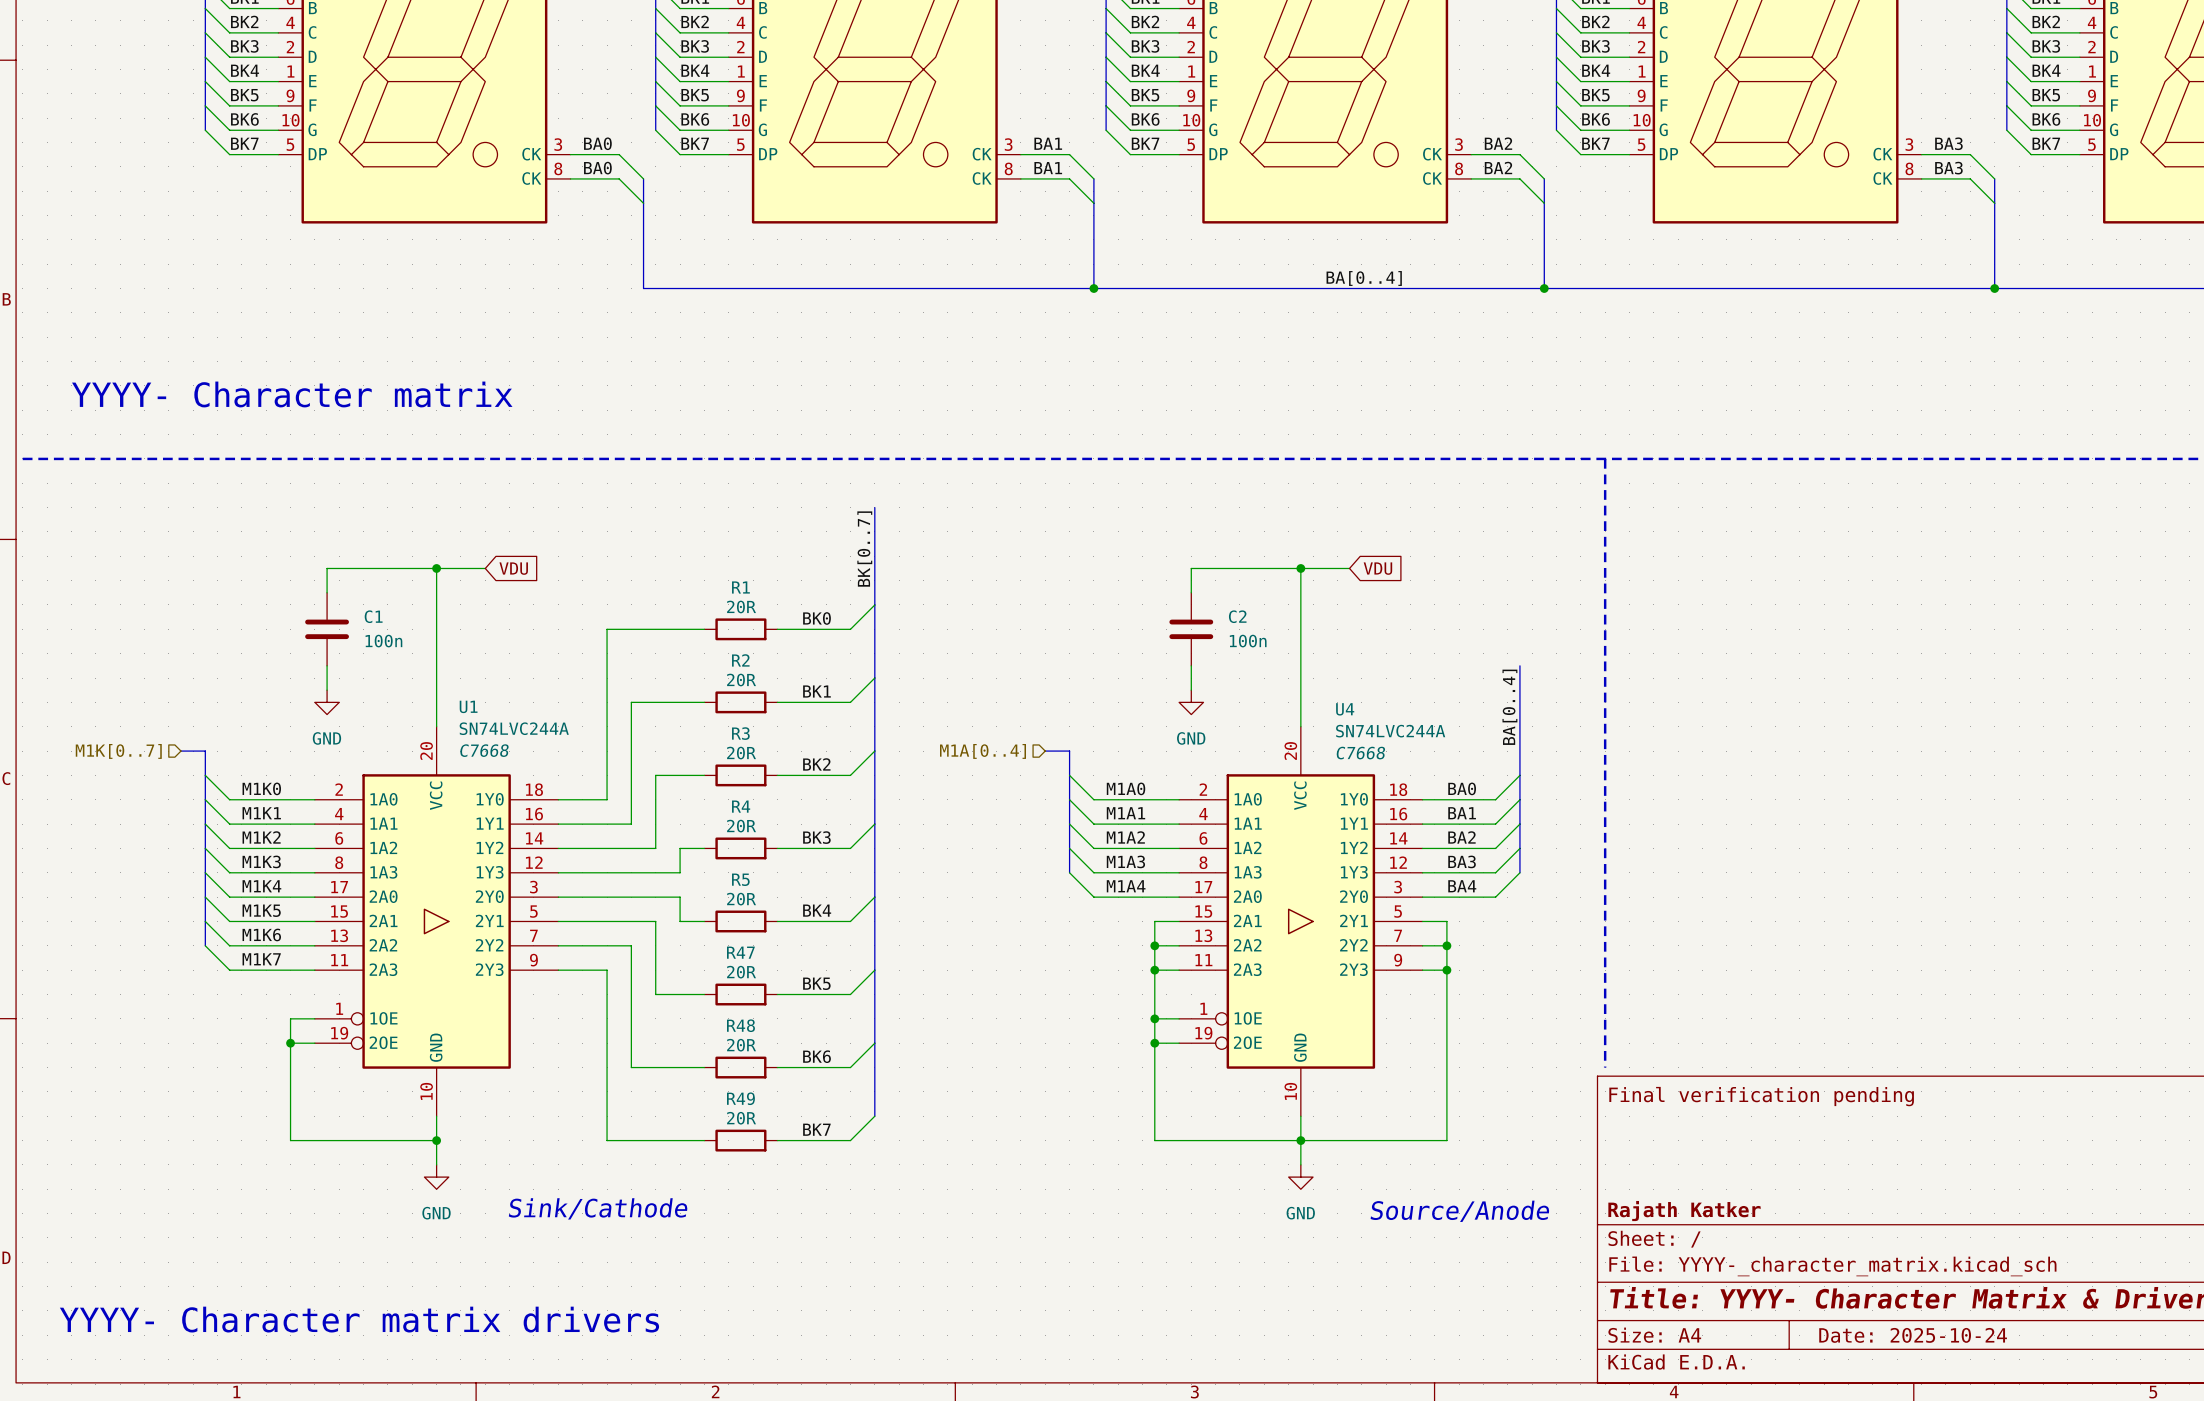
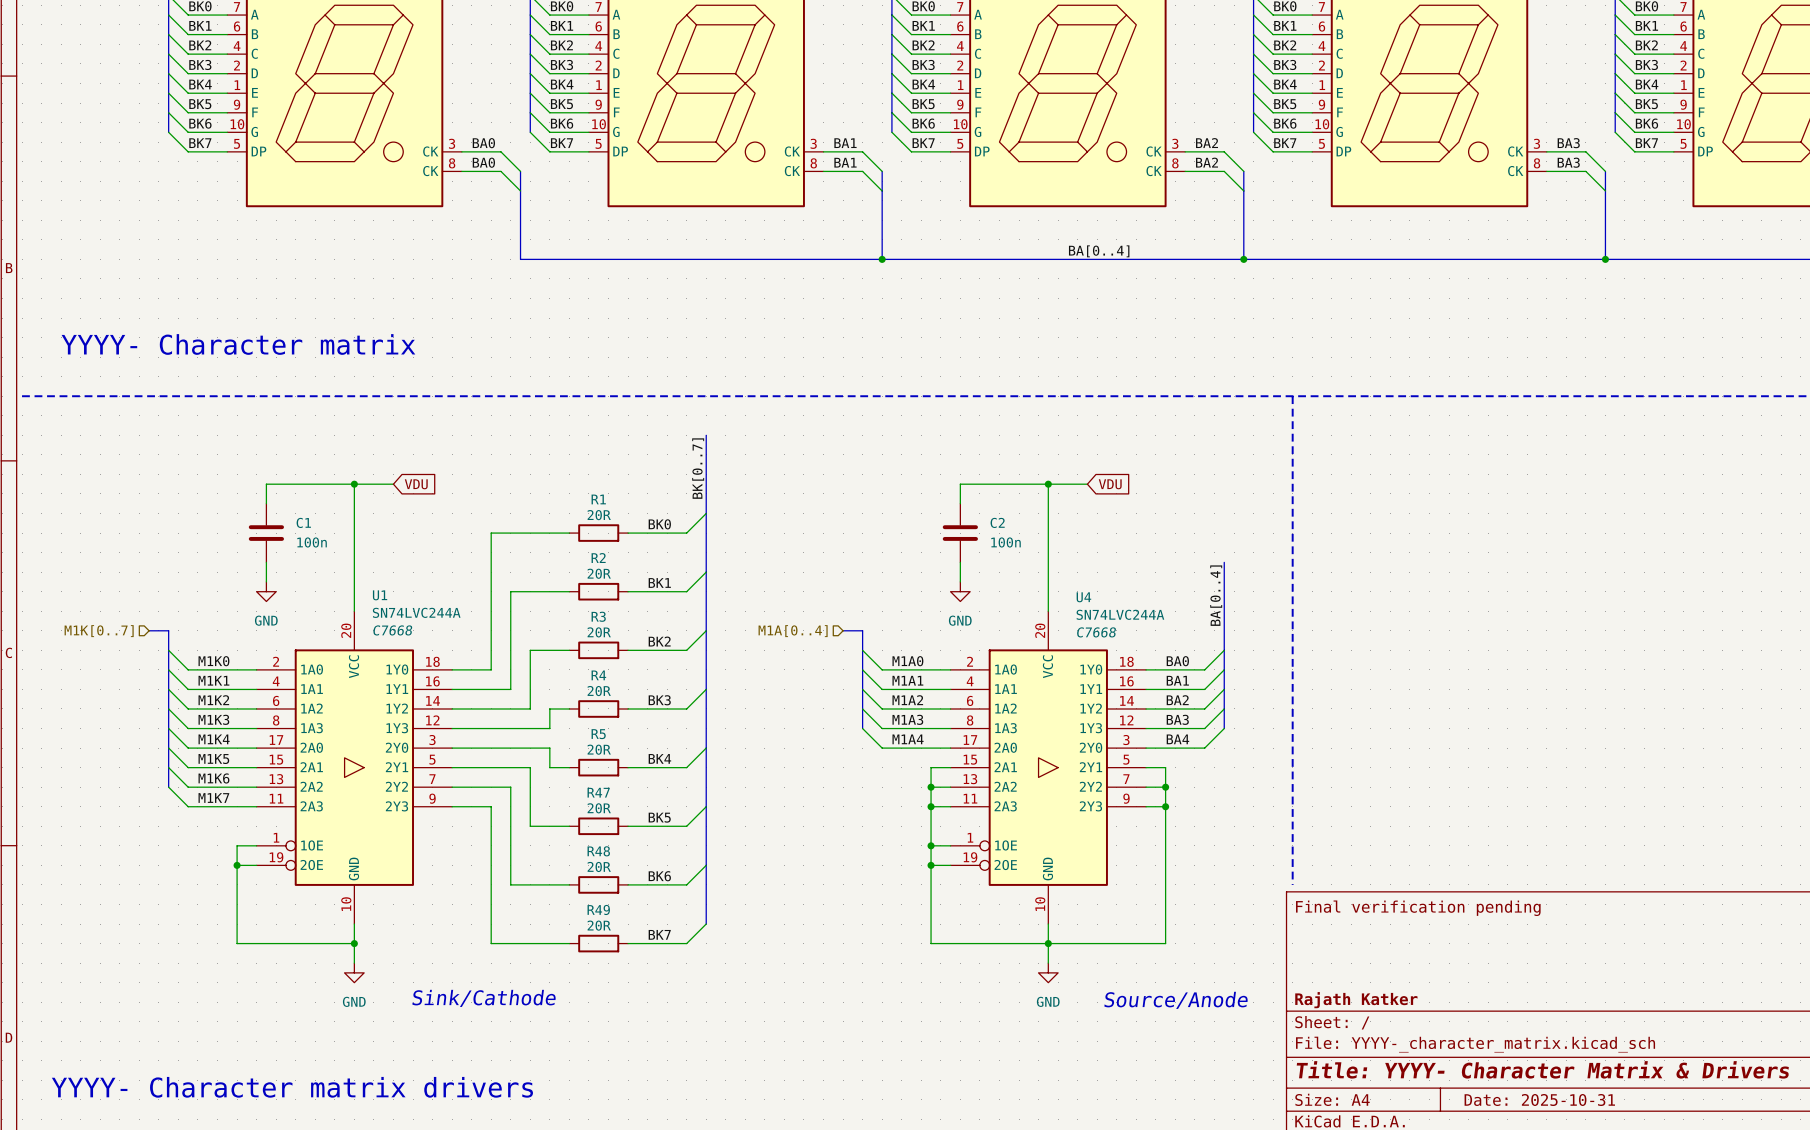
title block: Date: 2025-10-24 (1913, 1335) -> Date: 2025-10-31 (1539, 1100)

